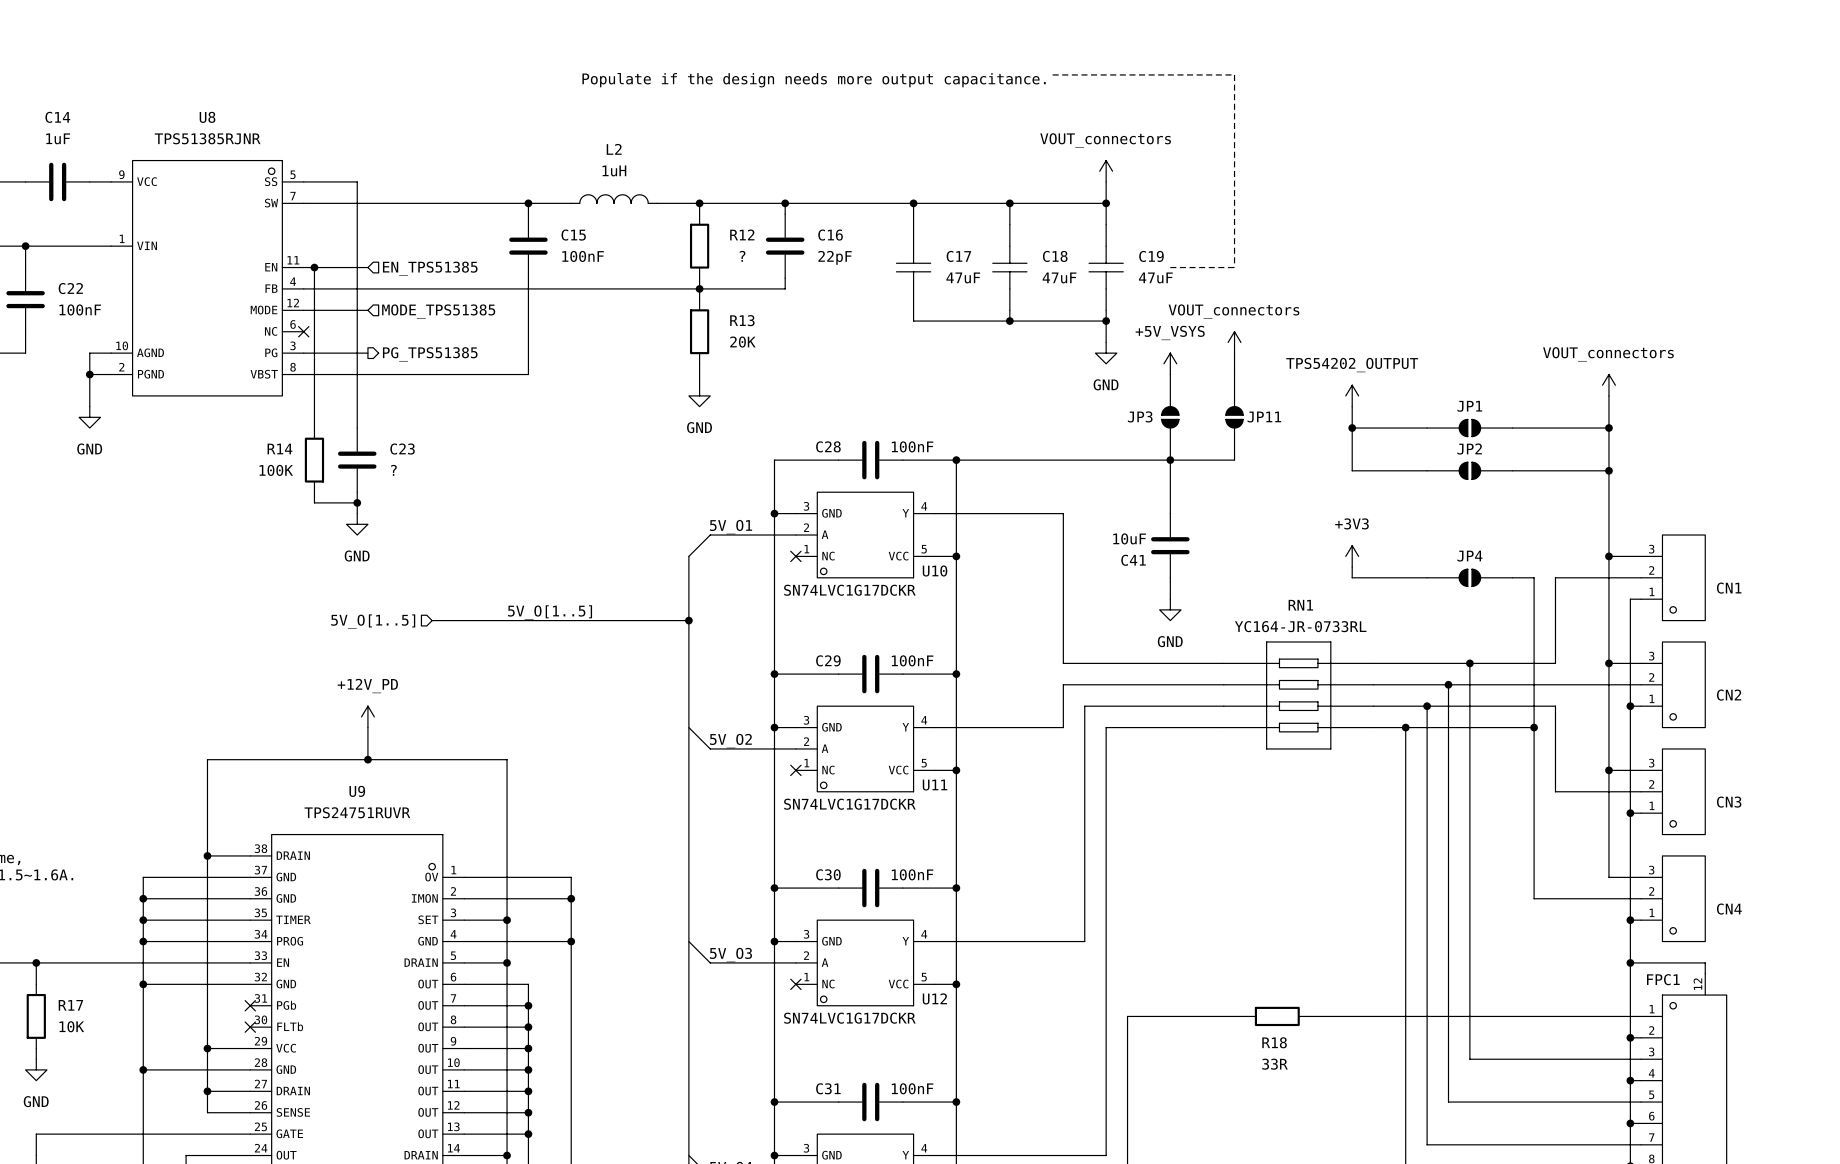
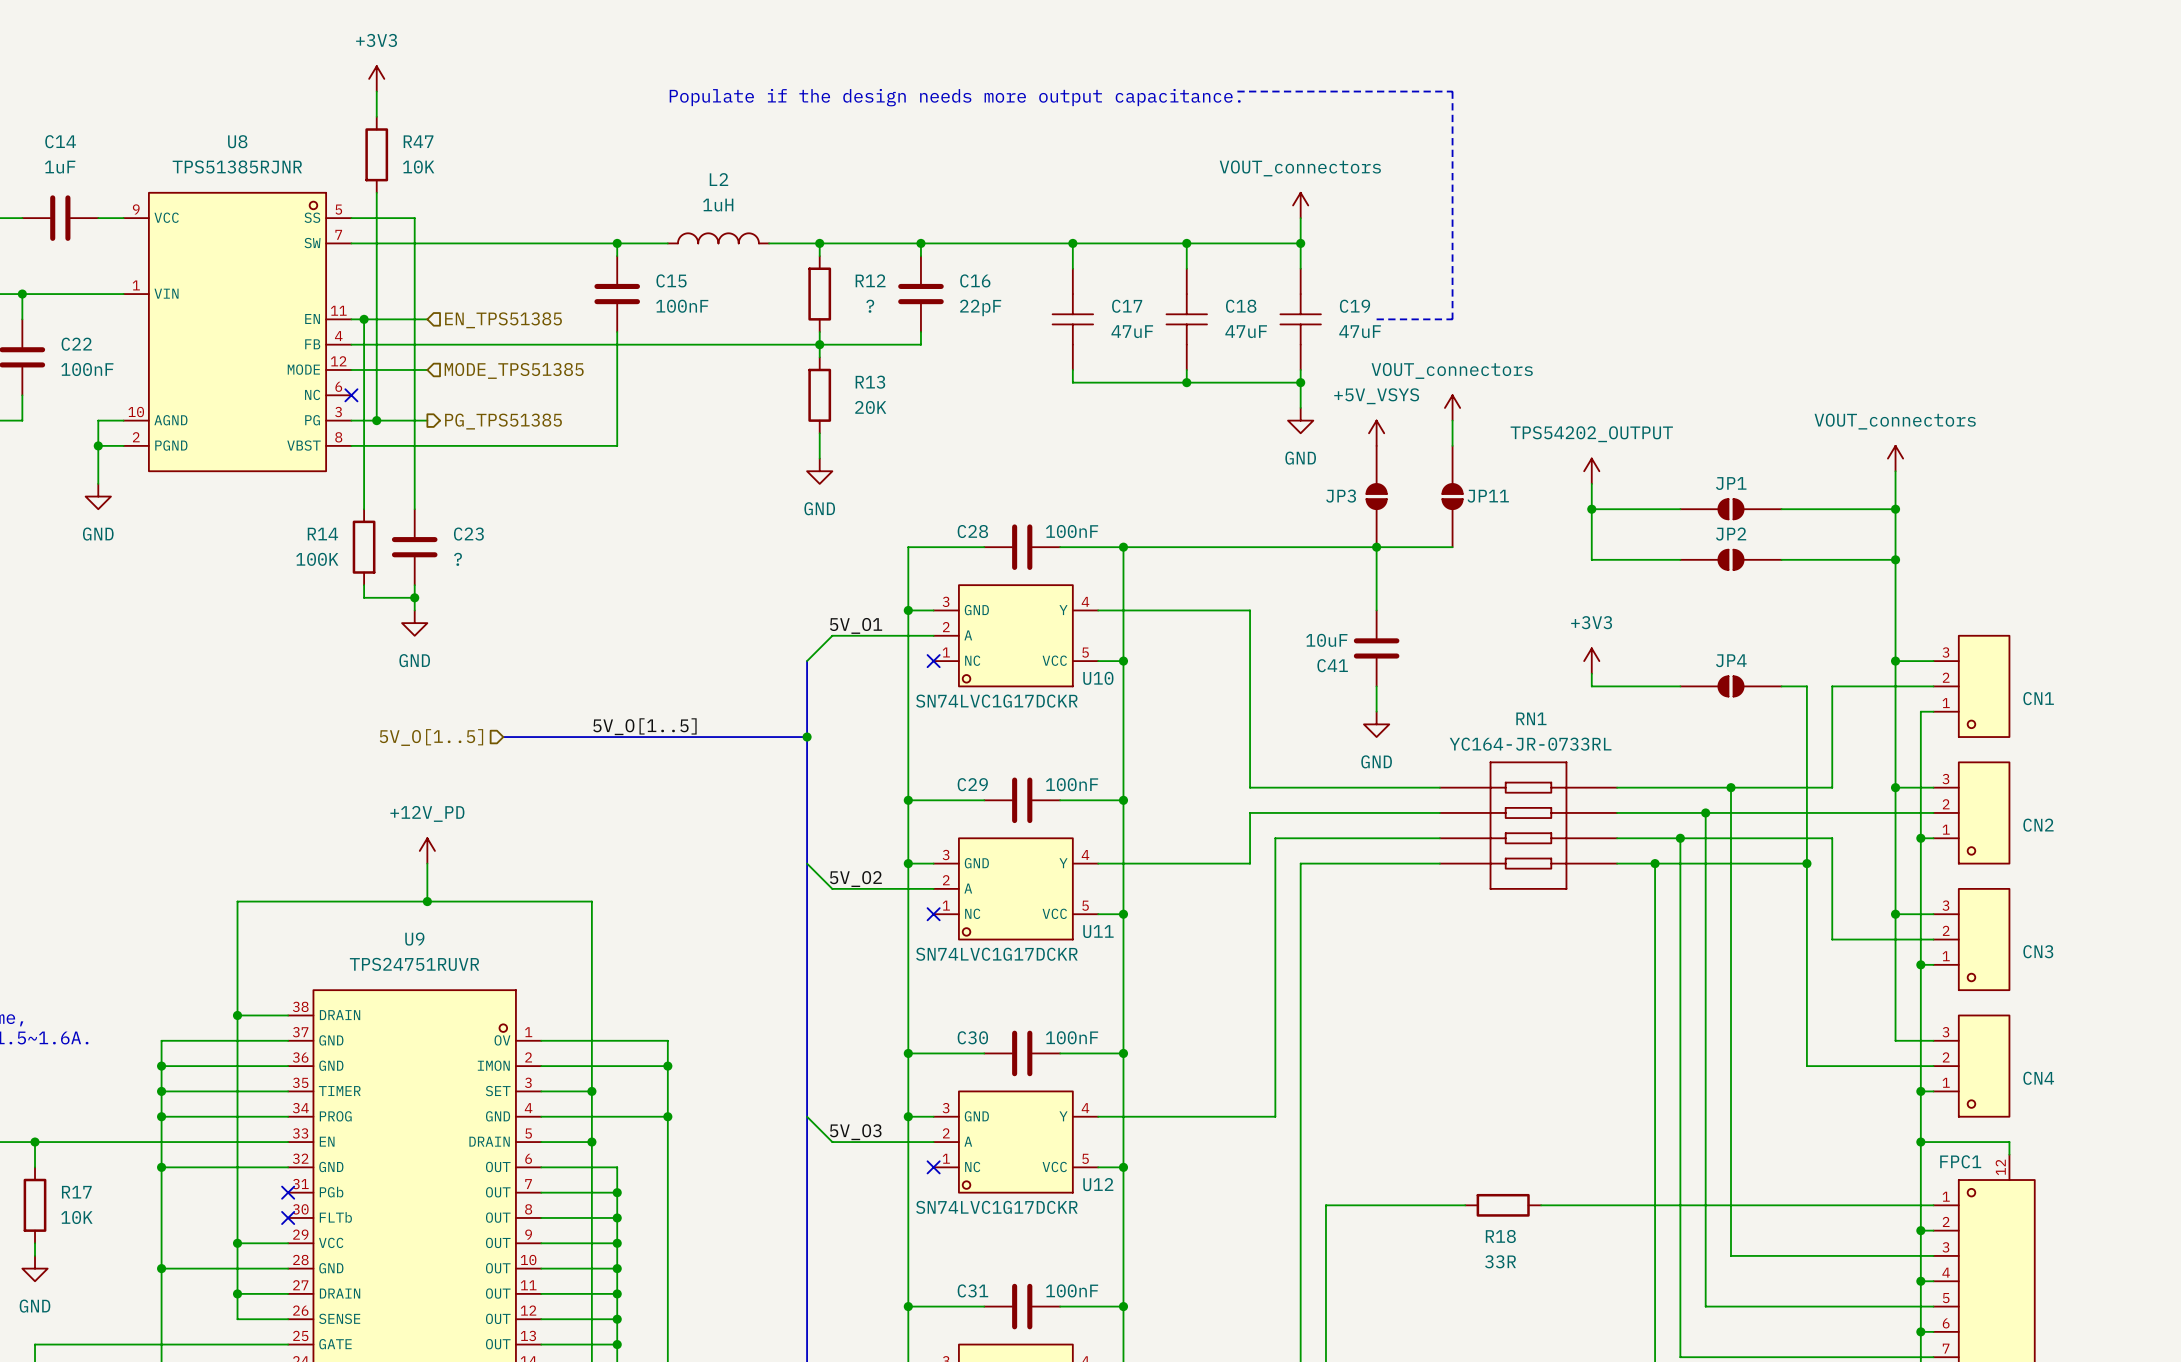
power symbol: none -> +3V3 (376, 78)
wire: none -> (376, 91) (376, 116)
R47: none -> 10K (376, 154)
wire: none -> (376, 192) (376, 420)
junction: none -> (376, 420)

